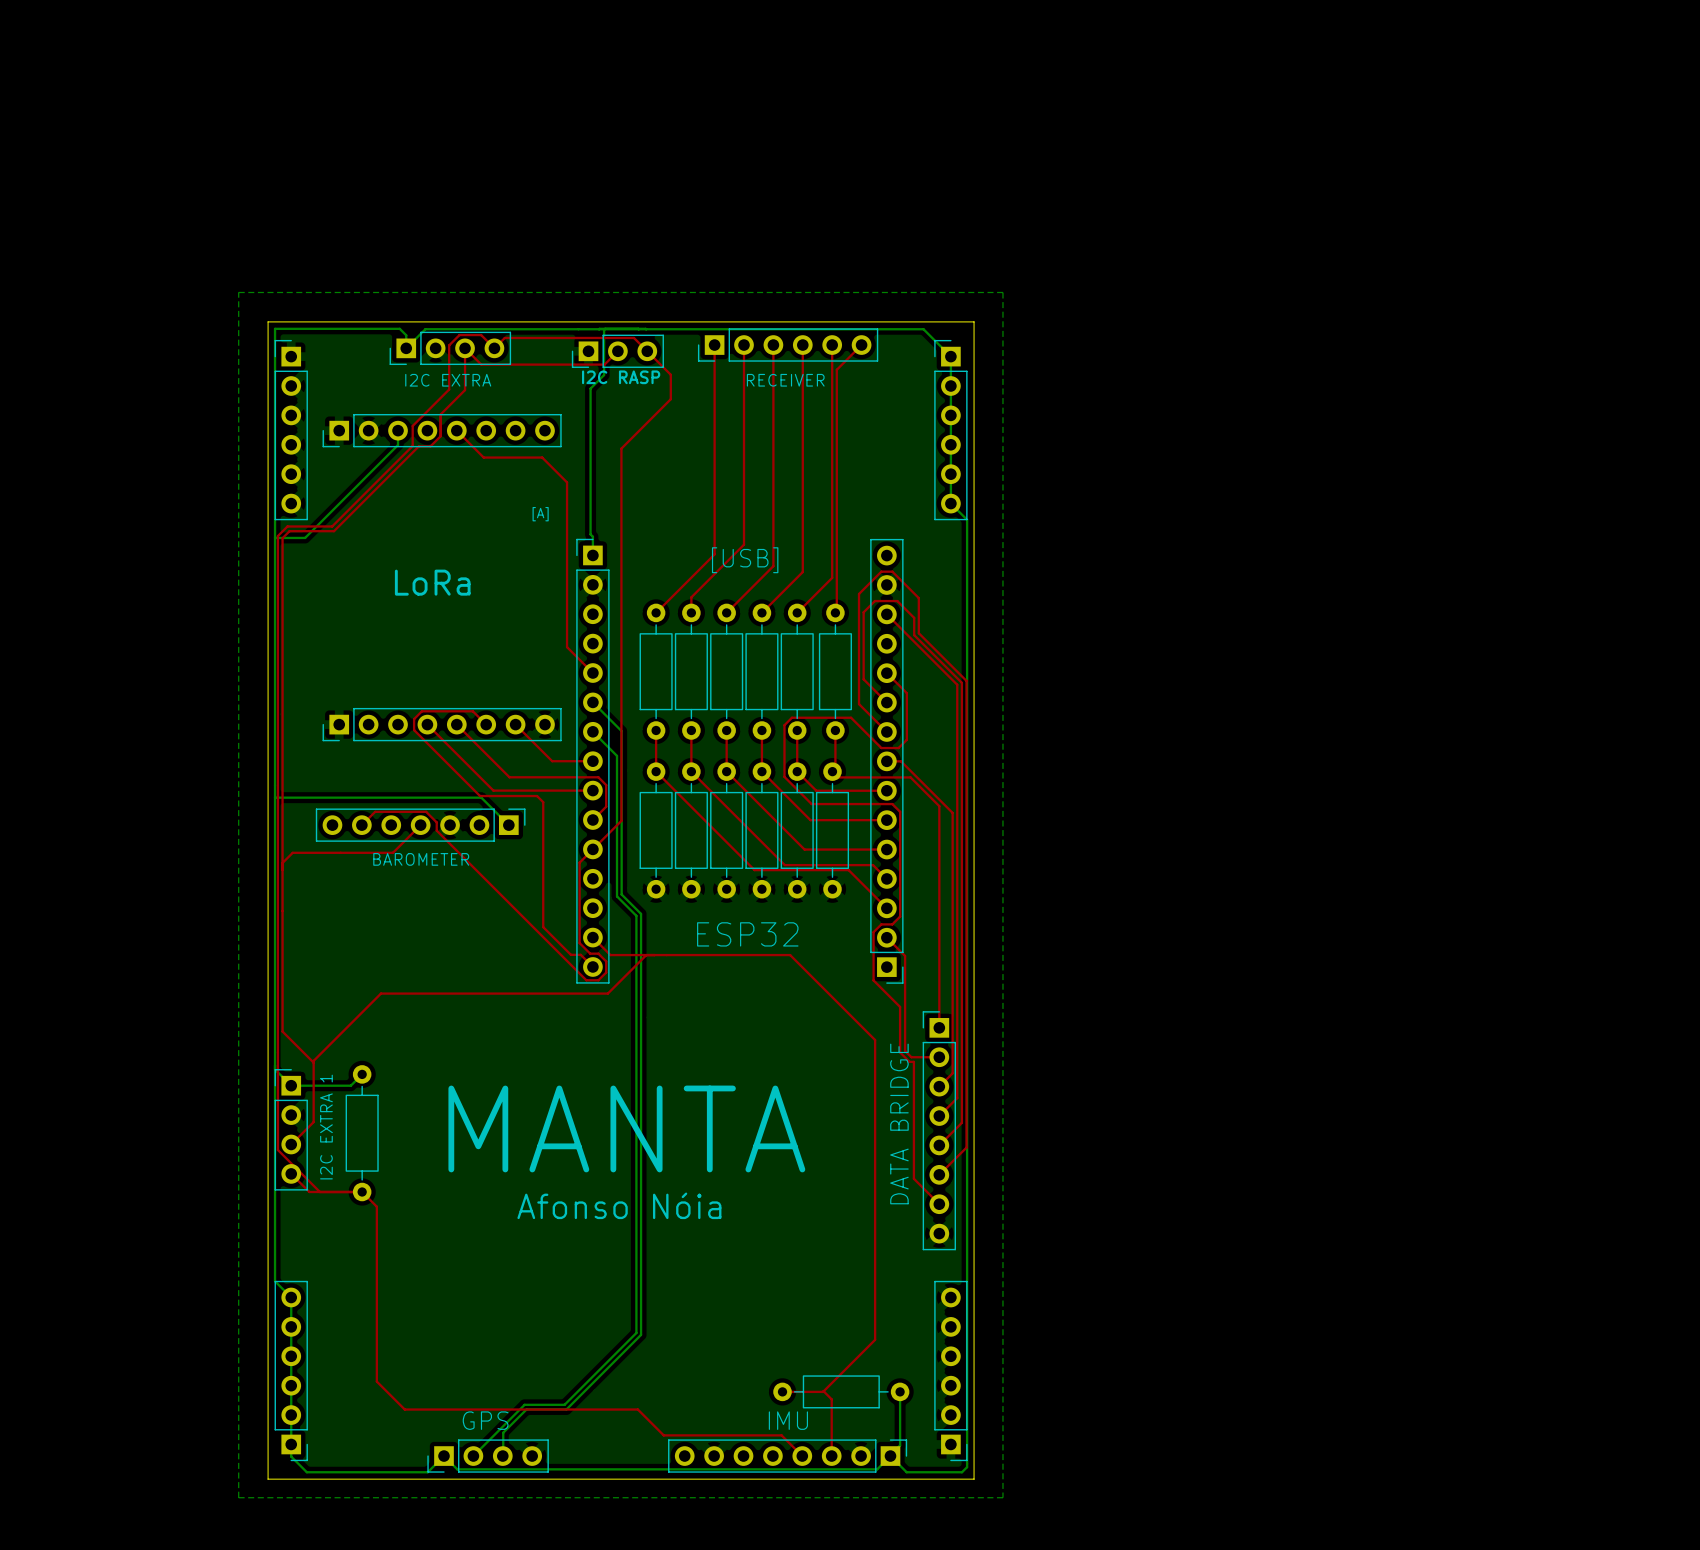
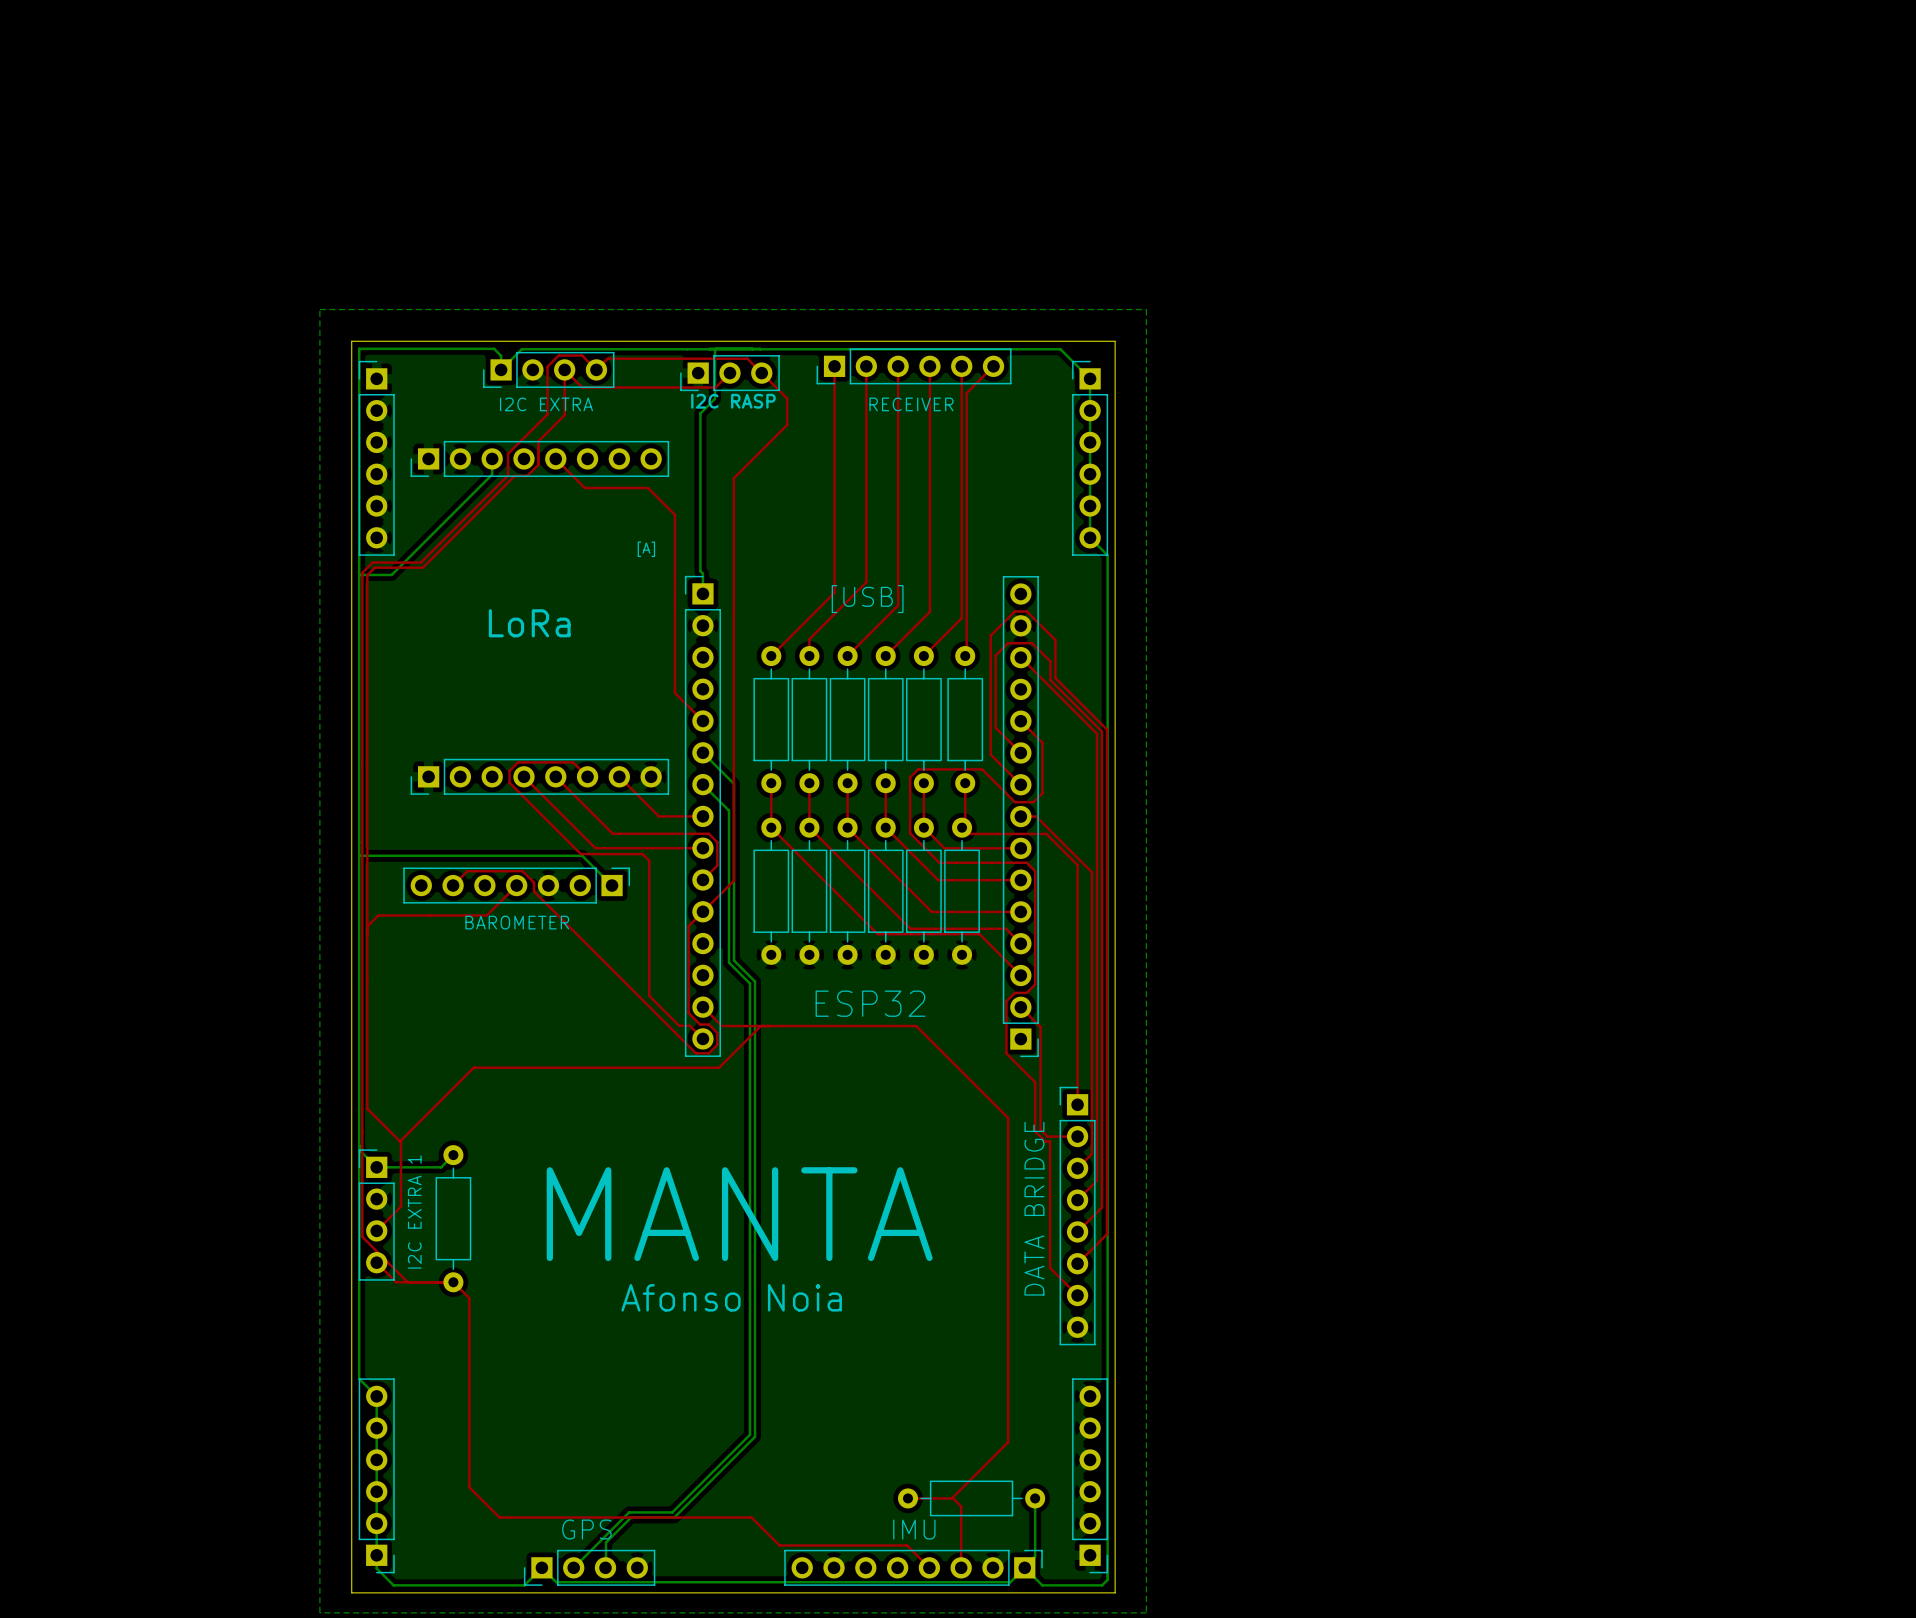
text: Afonso Nóia (619, 1205) -> Afonso Noia (731, 1297)

